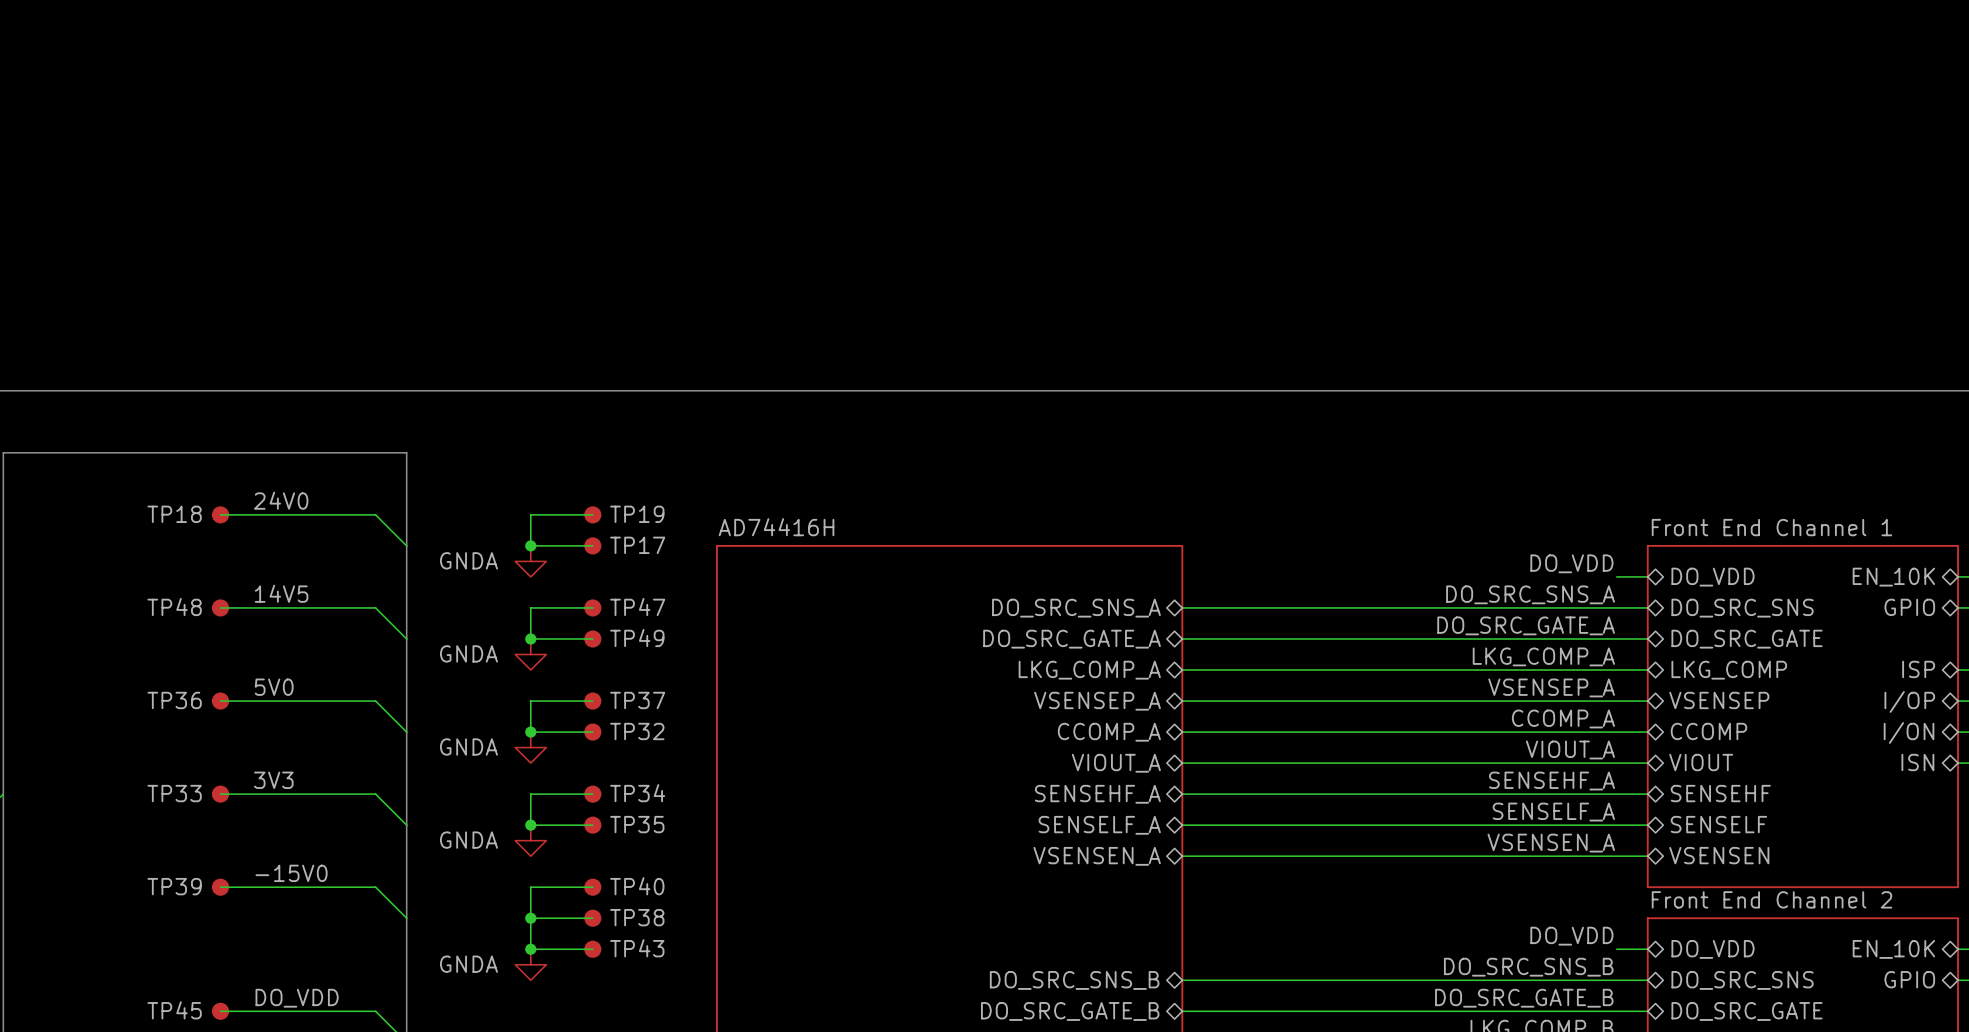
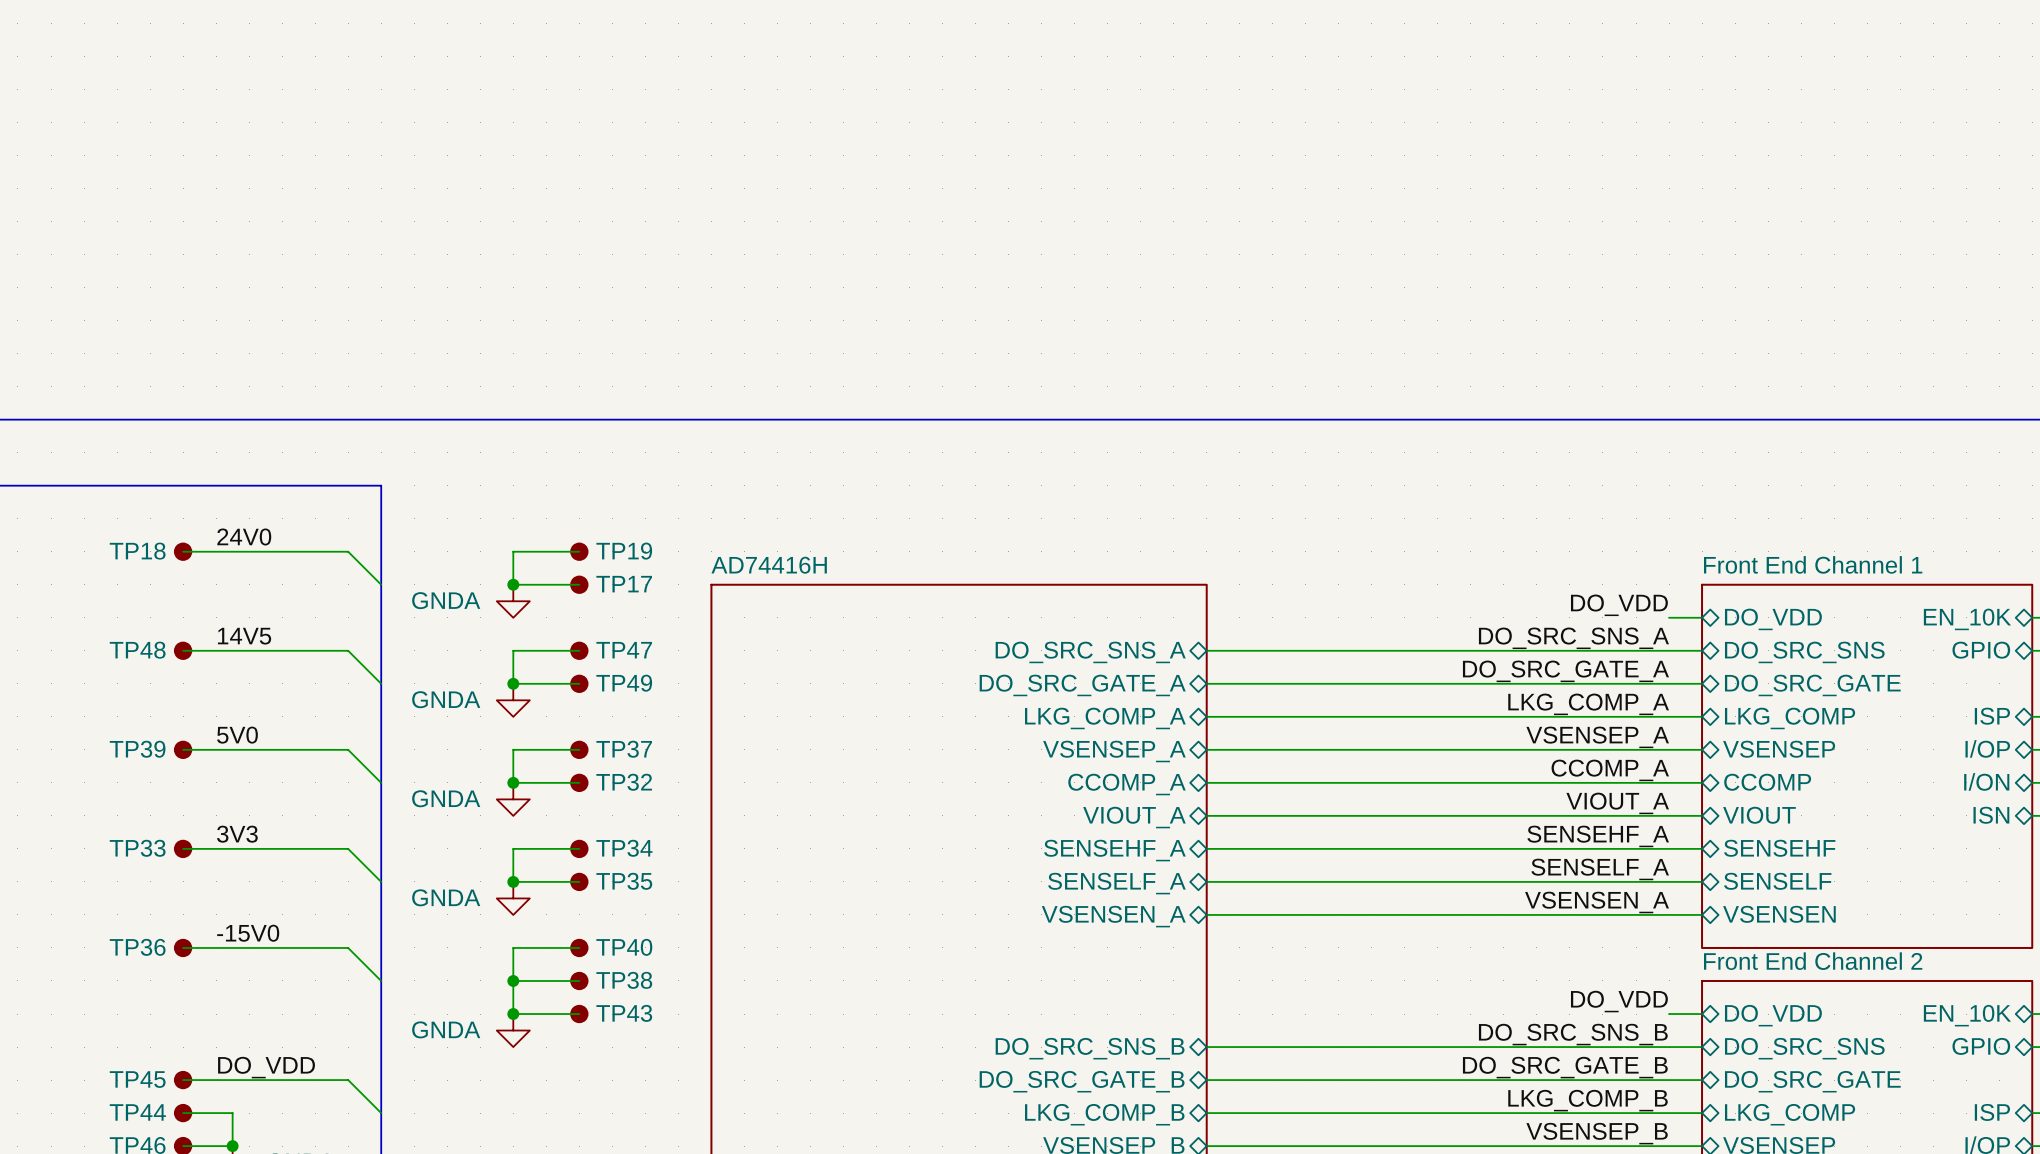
TP36 name: TP36 (174, 700) -> TP39 (137, 749)
TP39 name: TP39 (174, 886) -> TP36 (137, 947)

